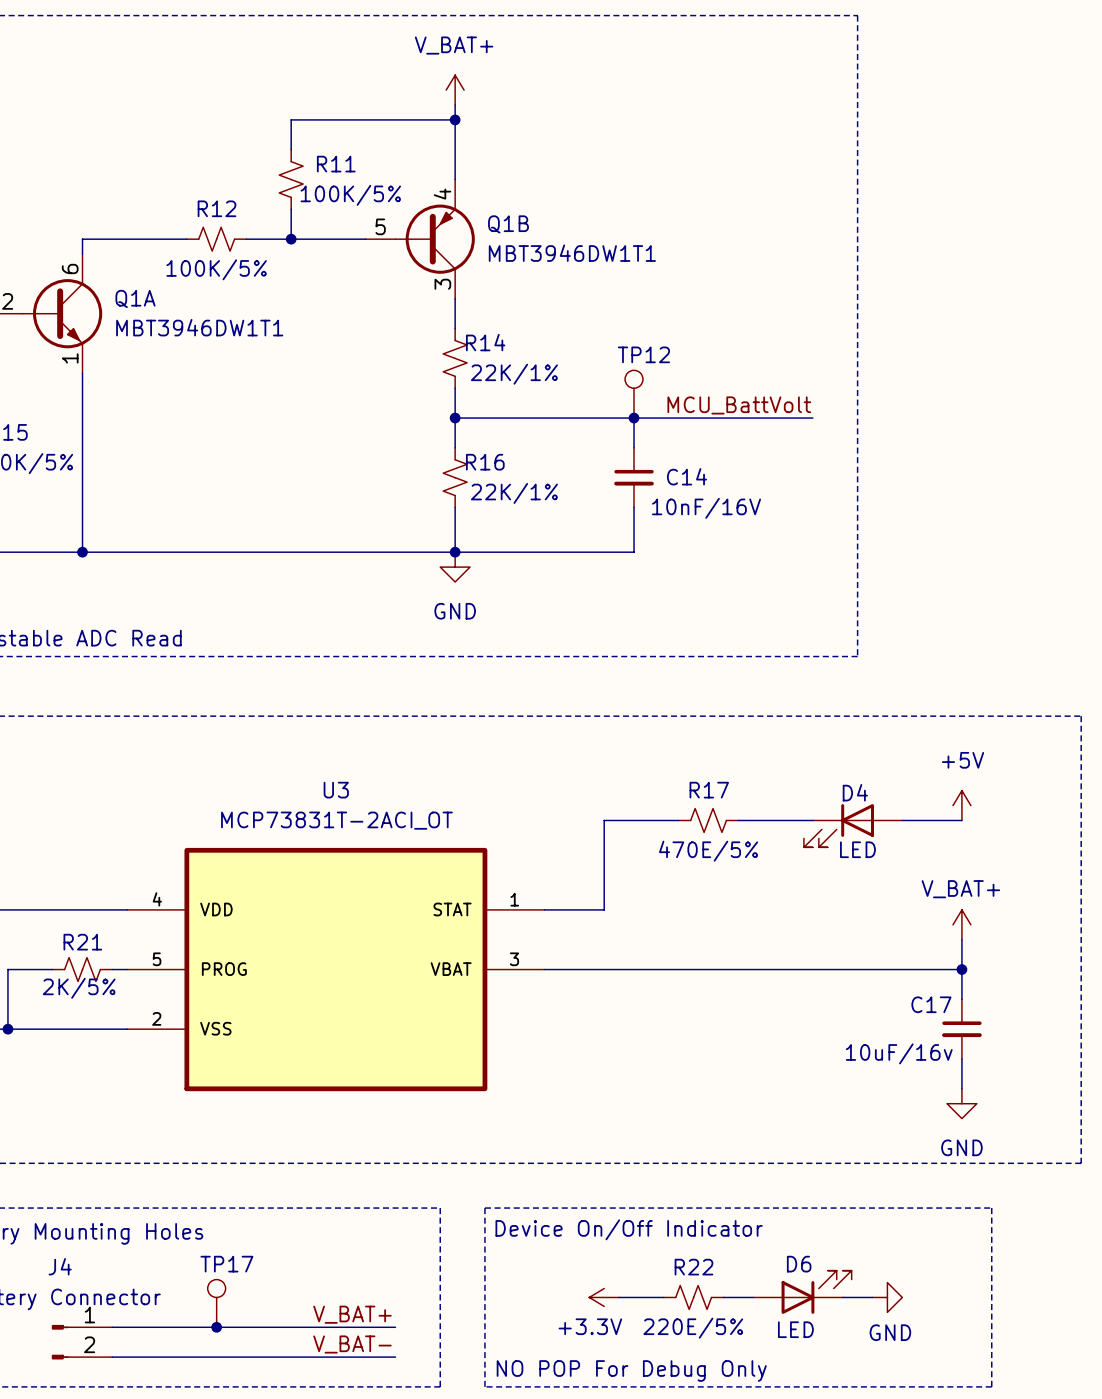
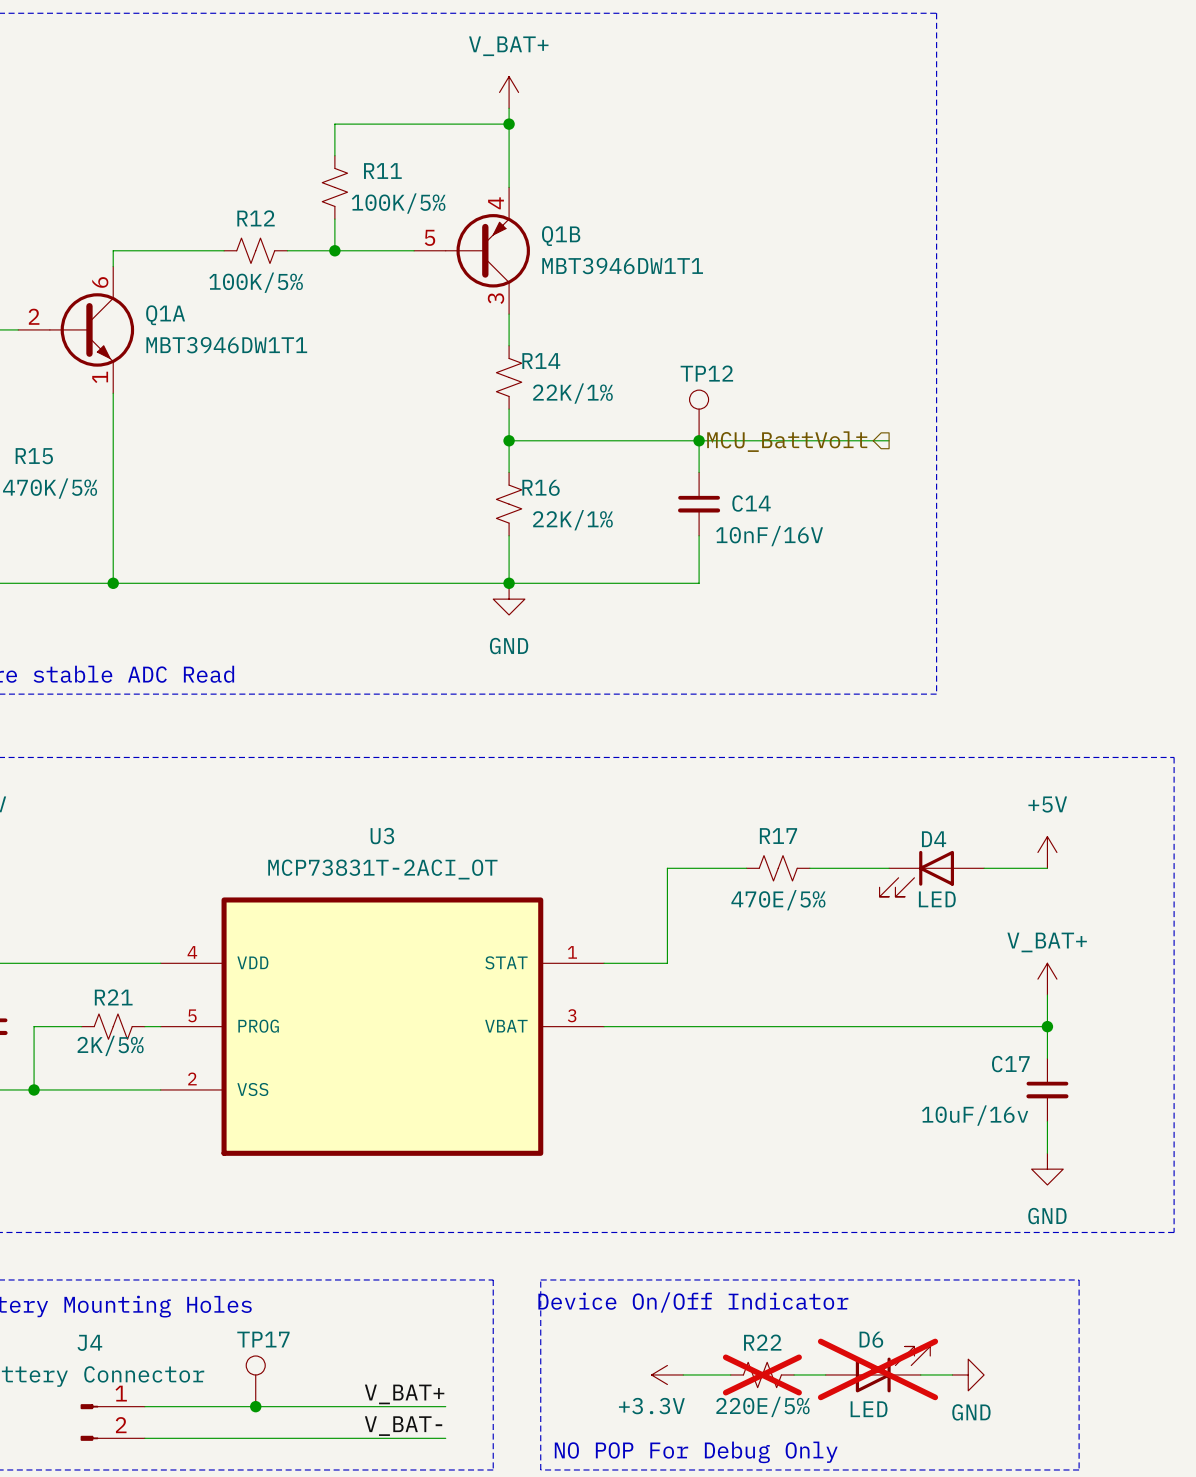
label: MCU_BattVolt (739, 405) -> none
hierarchical label: none -> MCU_BattVolt (787, 441)
D6 do-not-place cross: none -> (878, 1369)
R22 do-not-place cross: none -> (762, 1374)

